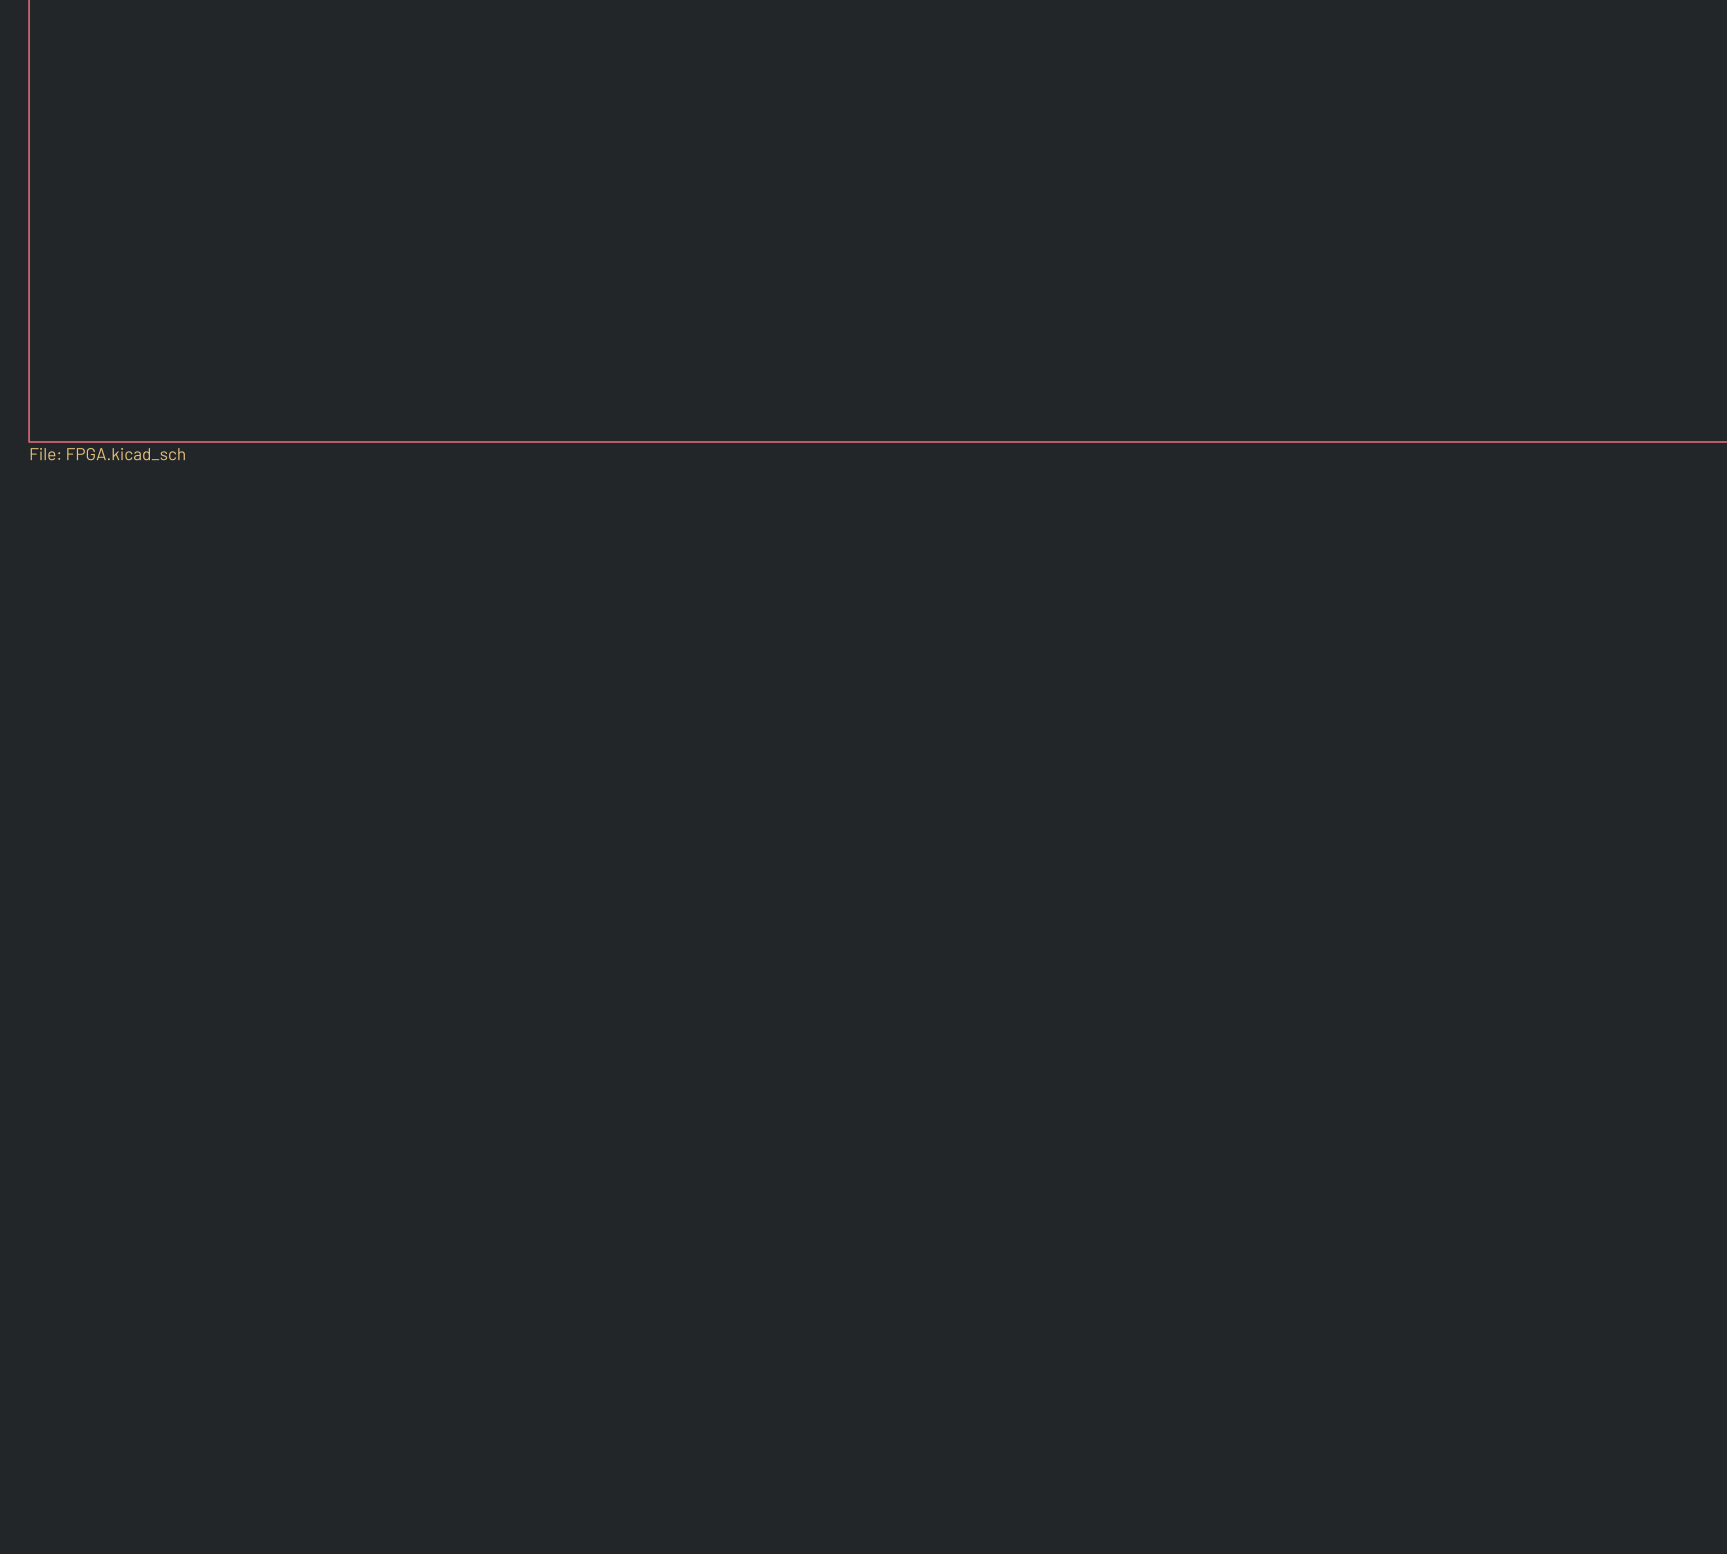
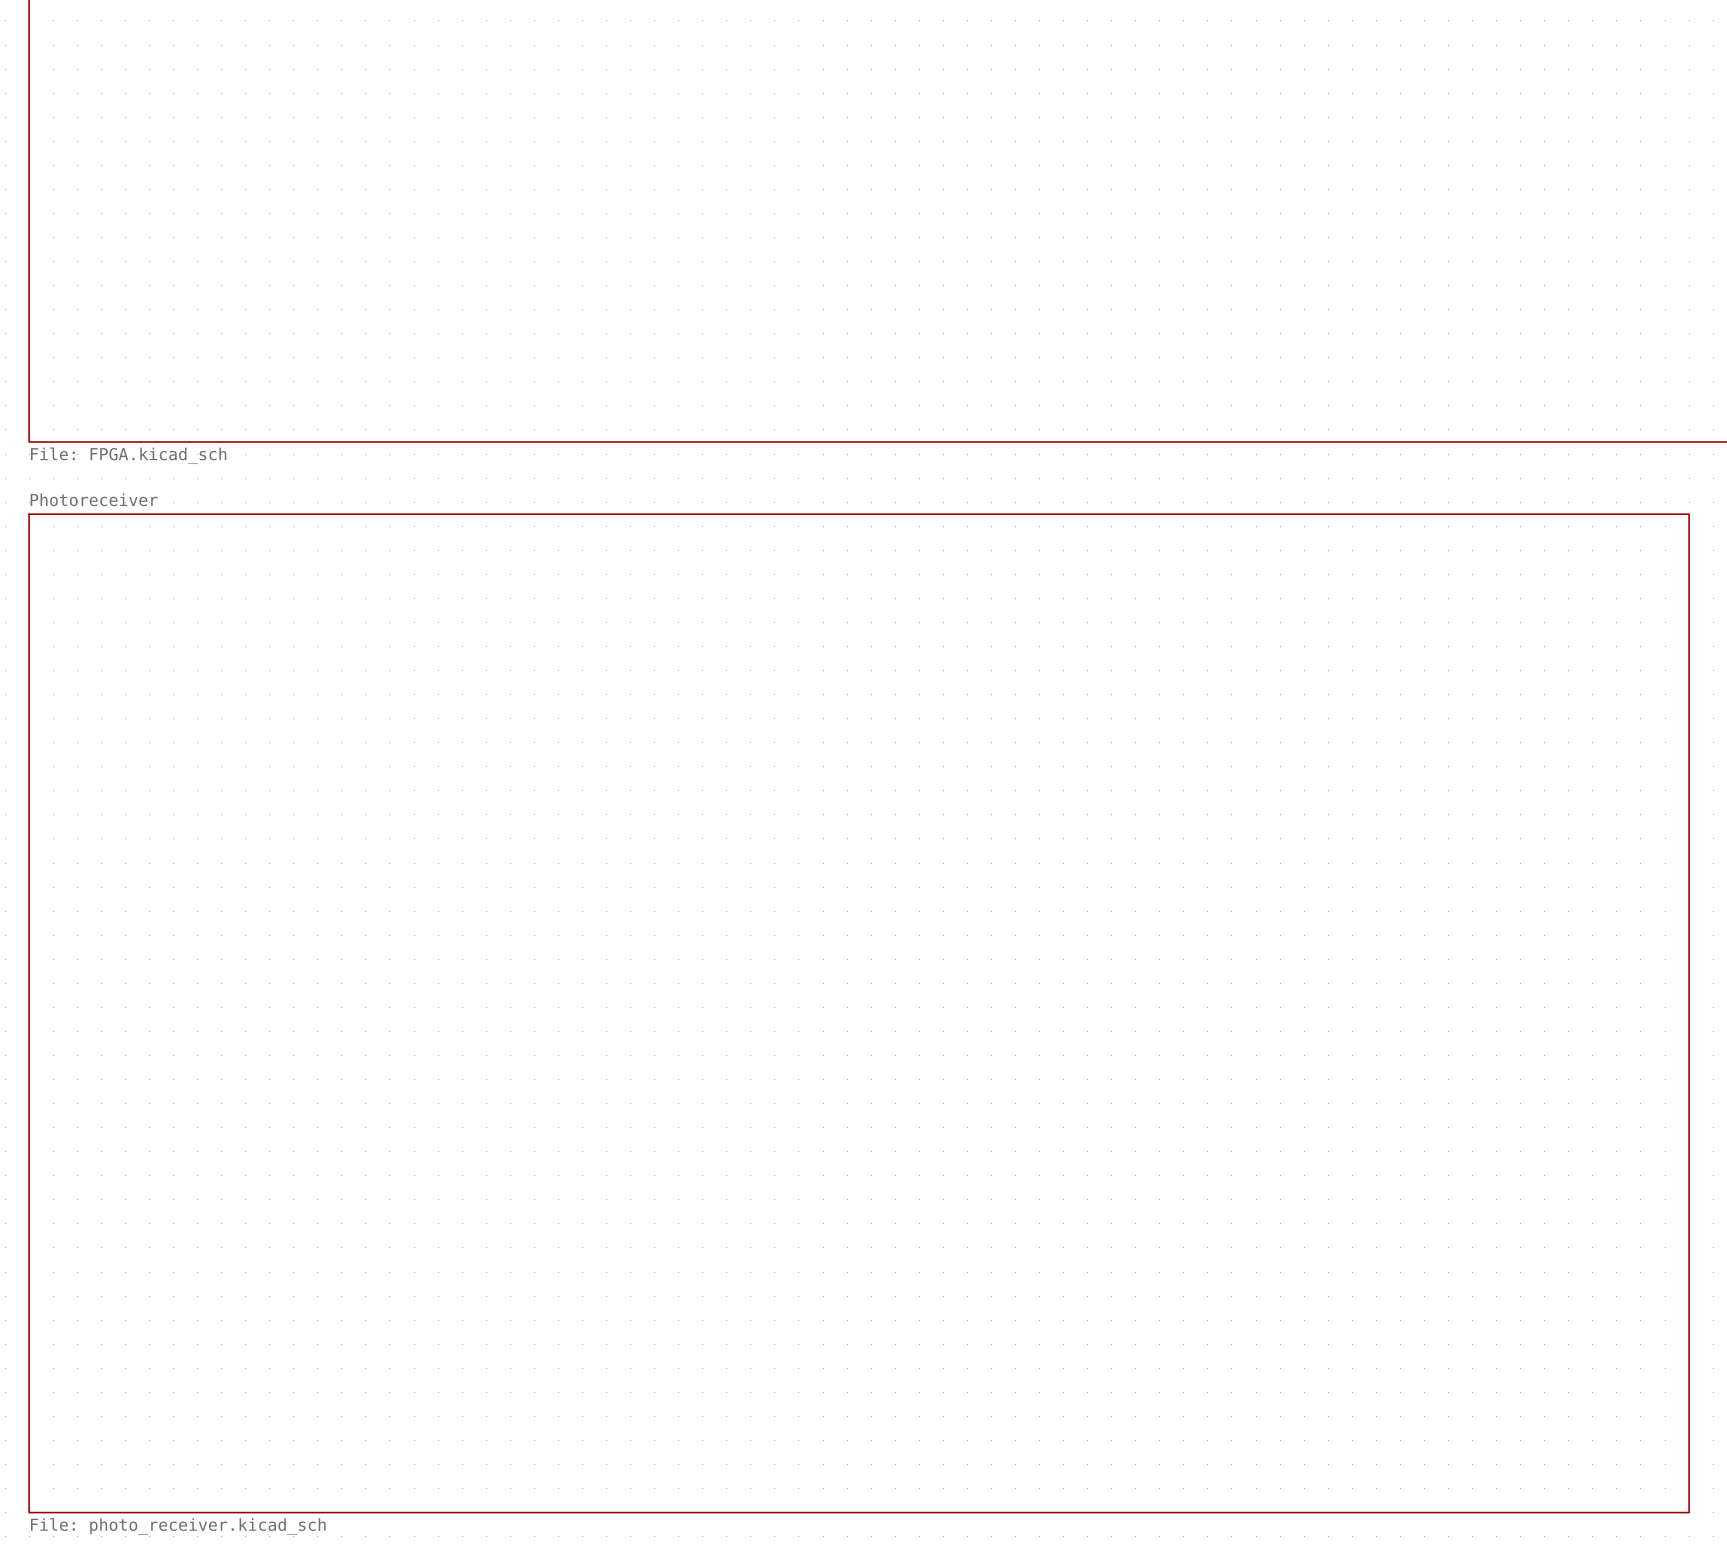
sheet Photoreceiver: none -> File: photo_receiver.kicad_sch (859, 1013)

